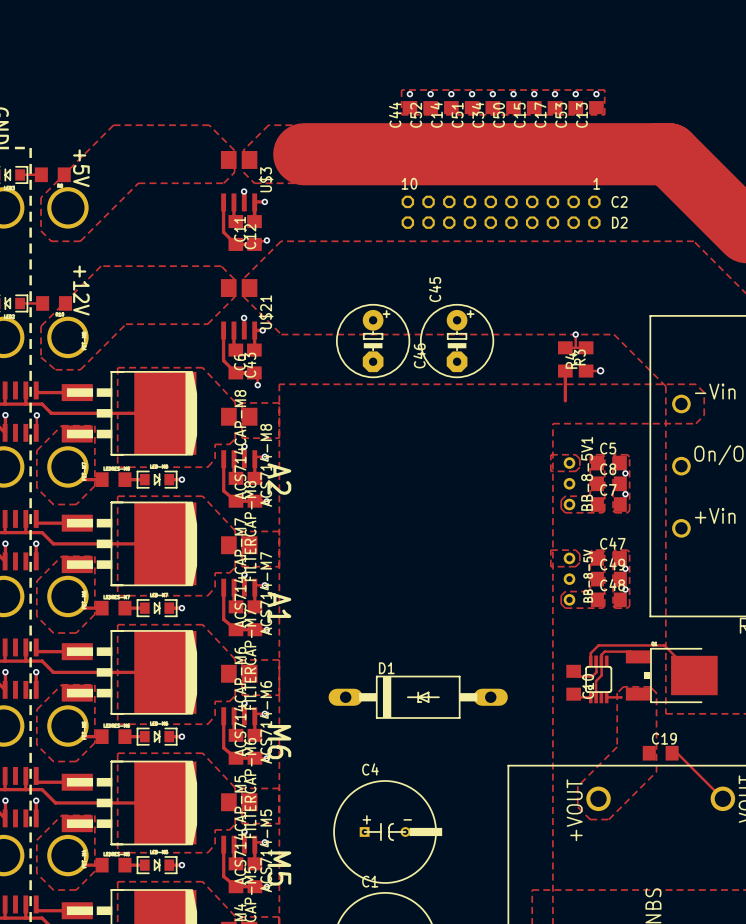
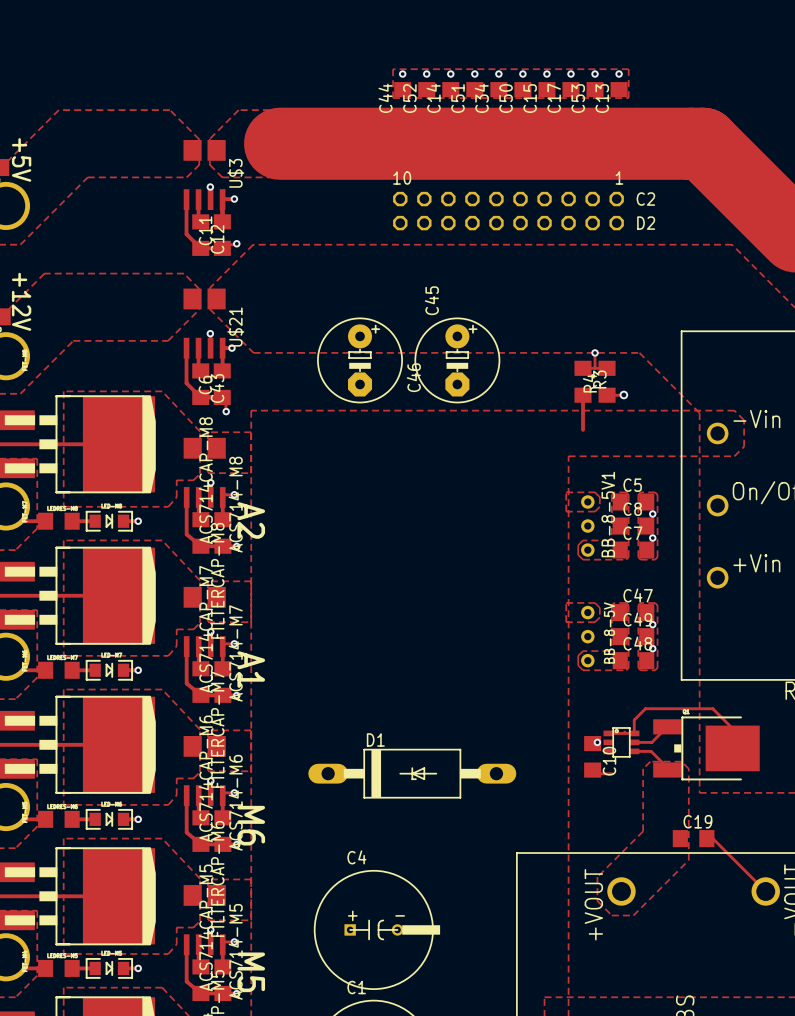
track: (638, 656) (630, 651) (604, 651) (601, 654) (601, 675) (596, 681) (596, 697) -> (667, 726) (651, 742) (634, 742)
track: (590, 661) (590, 653) (598, 645) (664, 645) (693, 674) -> (608, 733) (634, 733) (634, 720) (645, 708) (712, 708) (732, 727) (732, 747)
track: (596, 661) (596, 672) (592, 676) (578, 676) (573, 671) -> none
via: none -> (597, 742)
part: none -> (621, 742)
track: none -> (634, 751) (651, 751) (667, 770)
part: (598, 679) -> none
track: (606, 697) (621, 697) -> none

